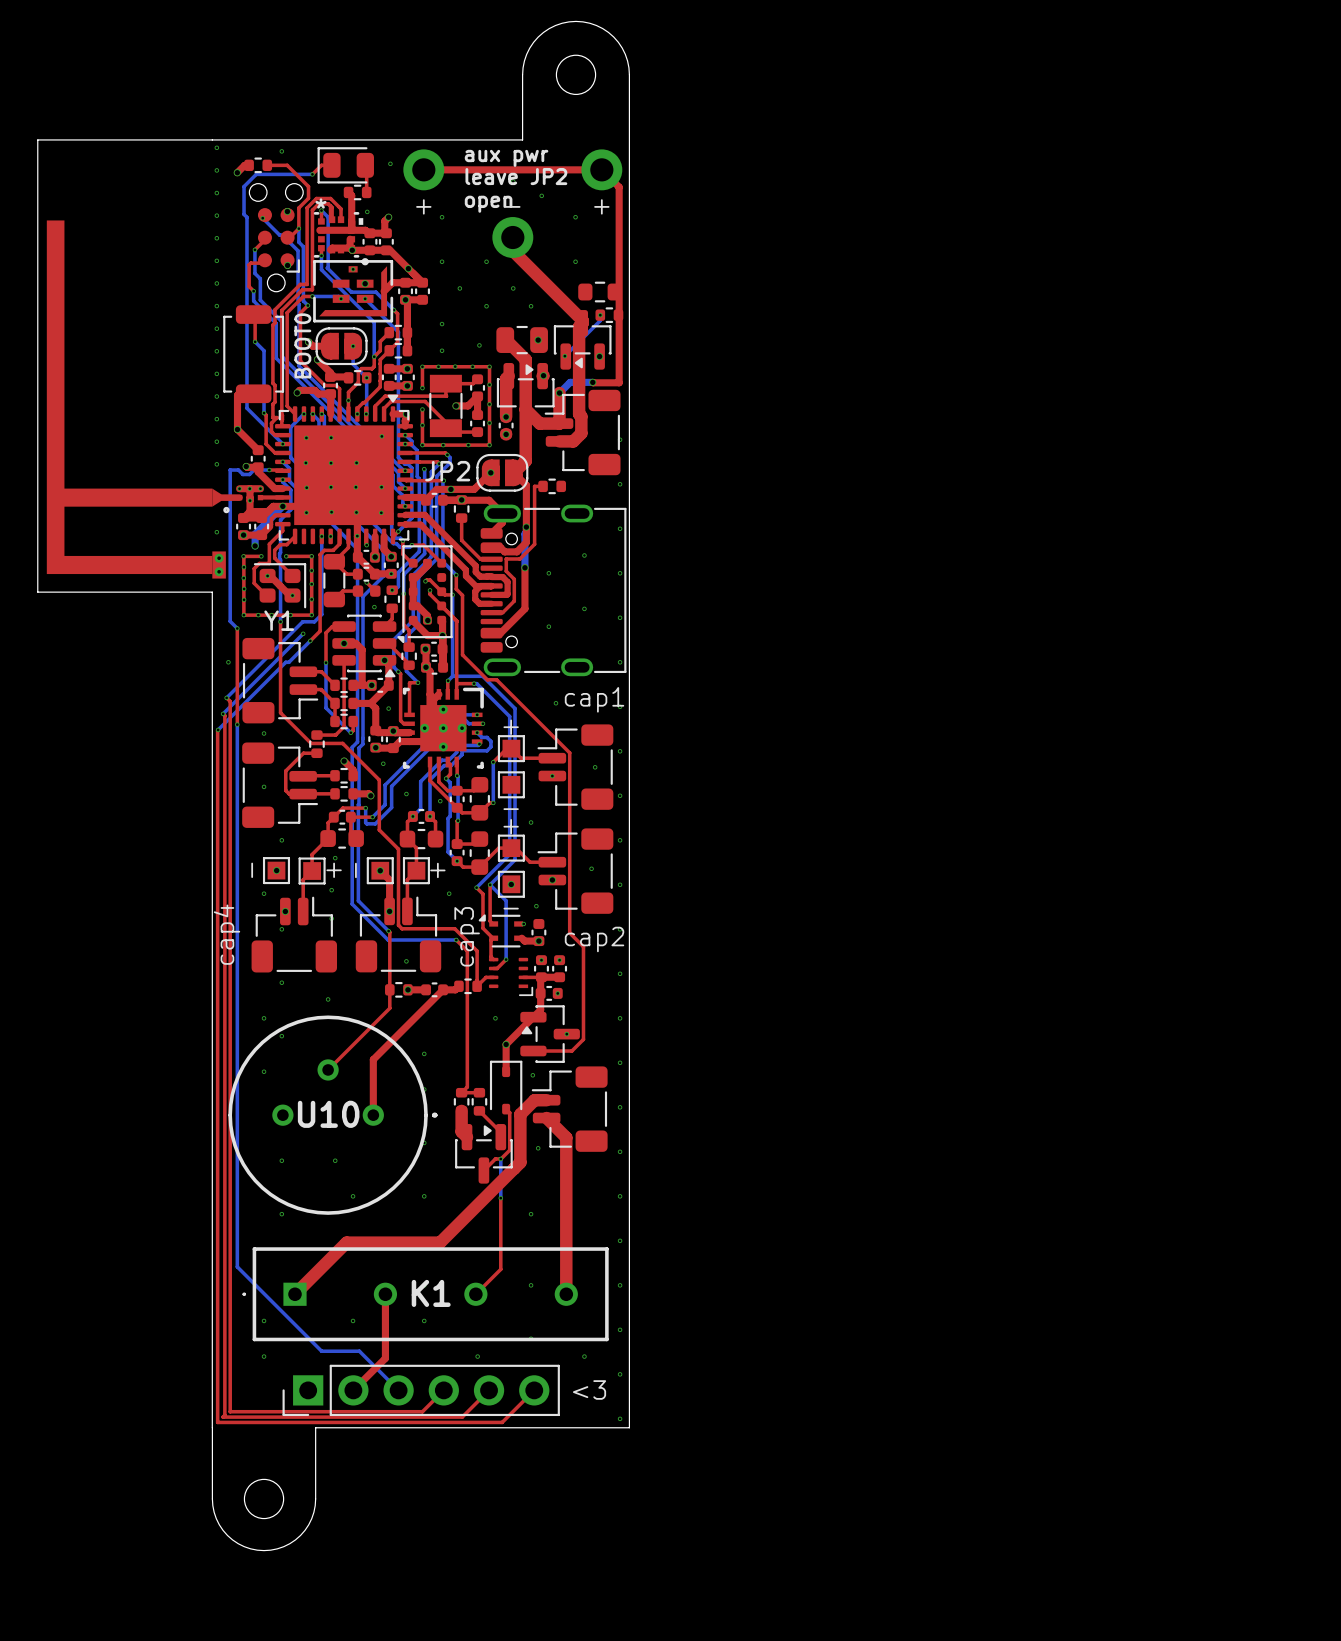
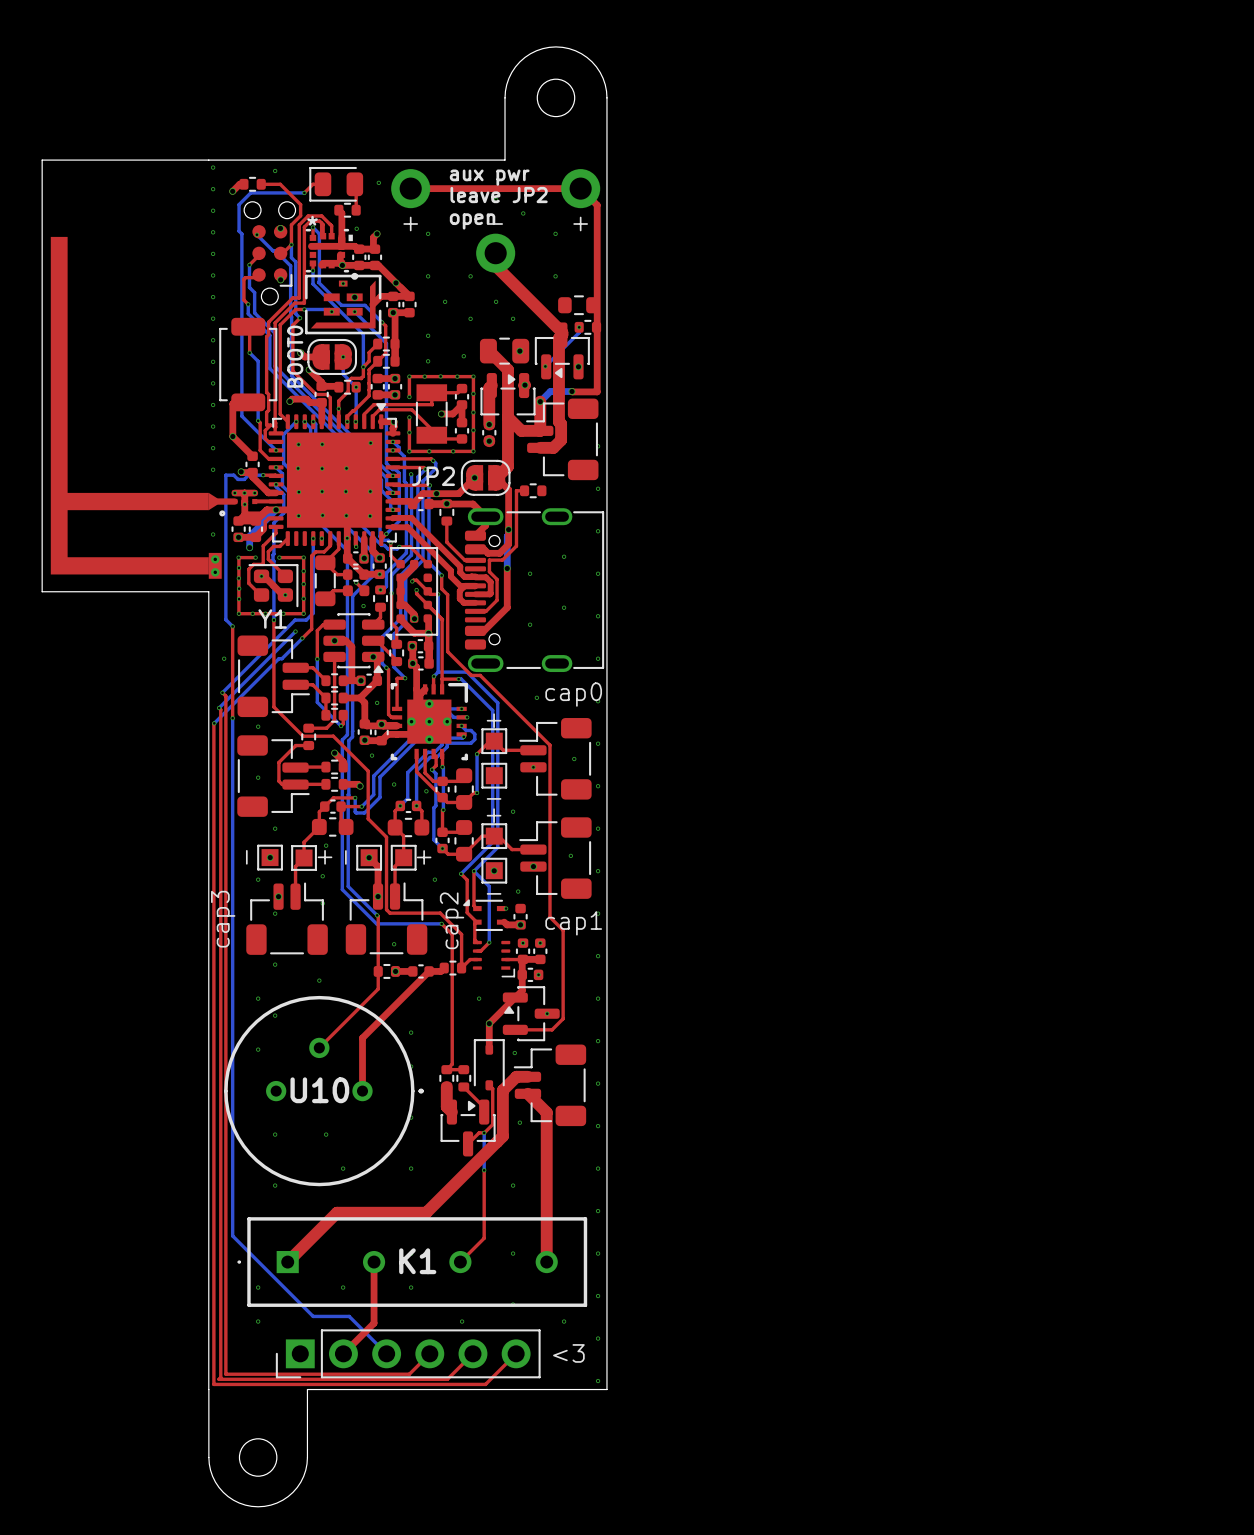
text: cap1 (594, 699) -> cap0 (573, 694)
text: cap4 (227, 934) -> cap3 (223, 919)
text: cap3 (467, 936) -> cap2 (452, 920)
text: cap2 (594, 939) -> cap1 (573, 923)

